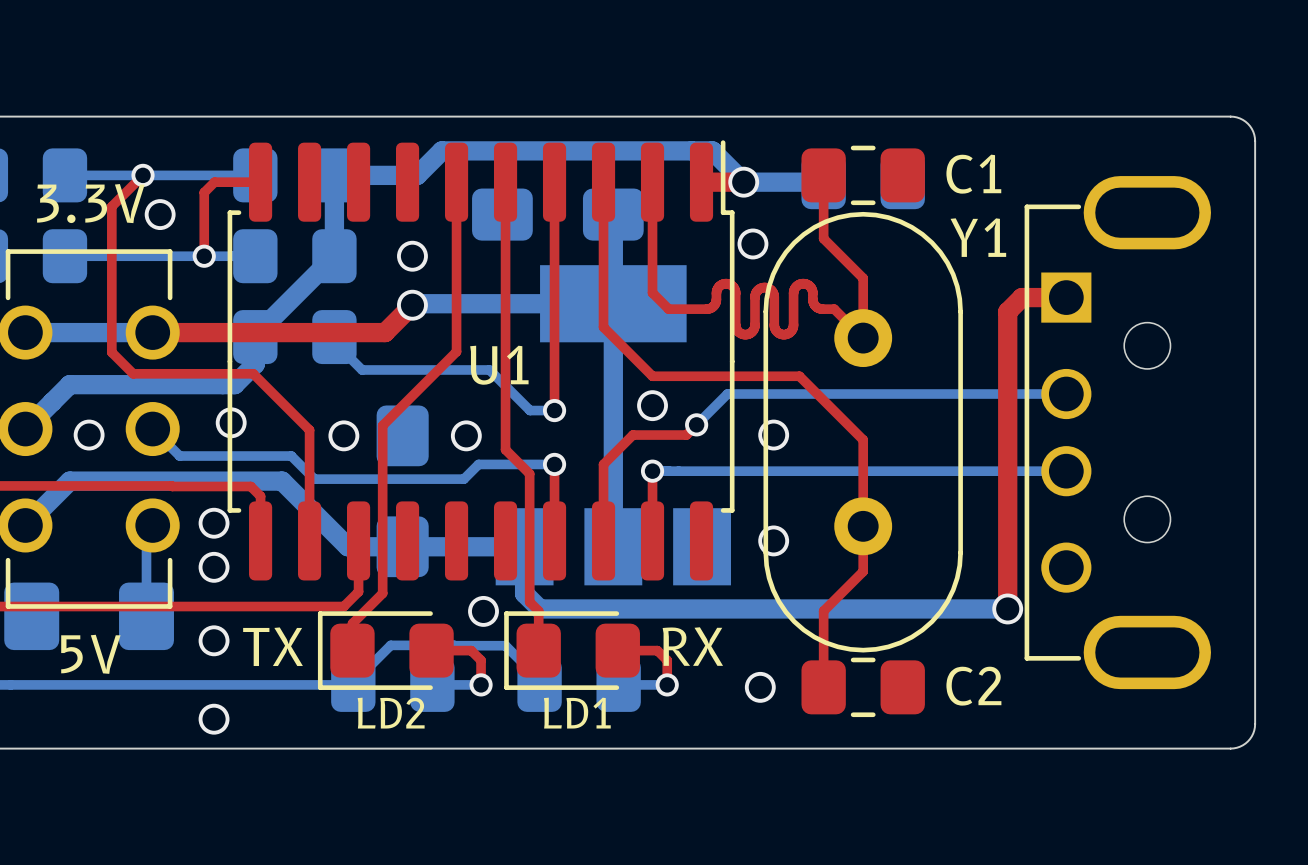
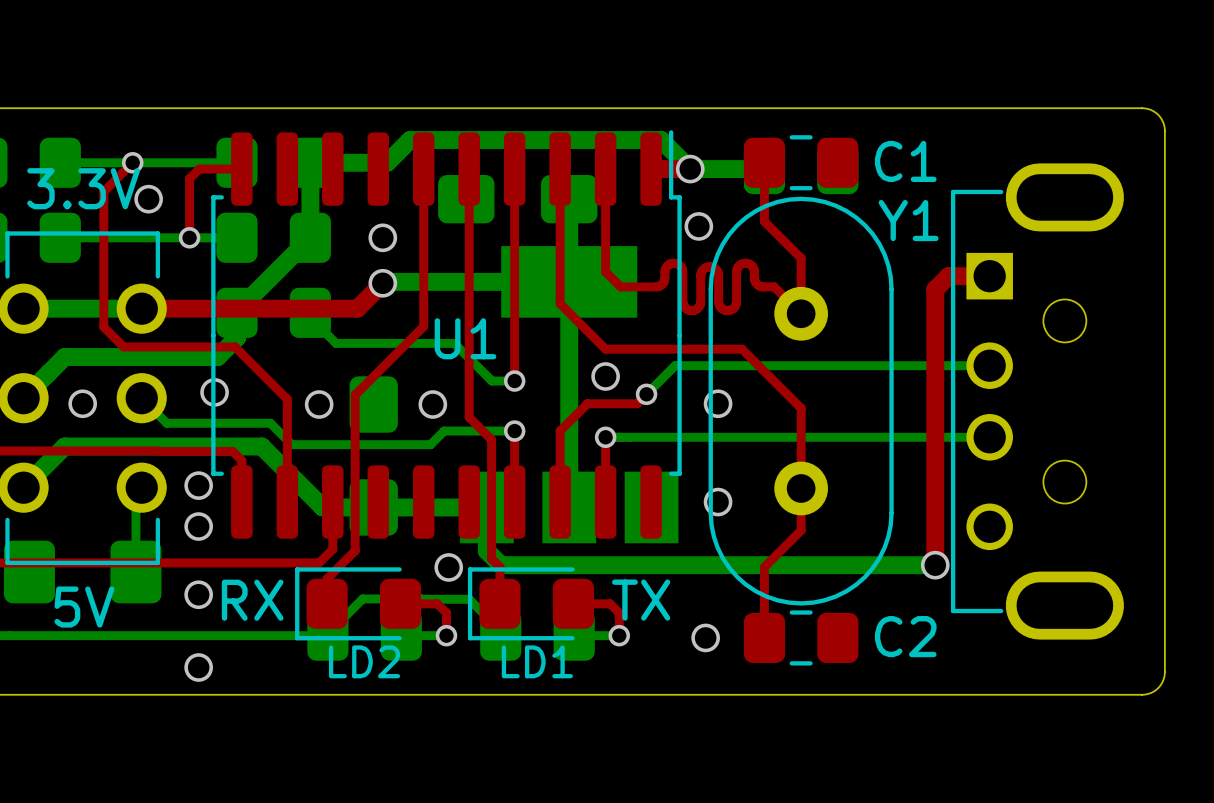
text: TX (273, 646) -> RX (252, 600)
text: RX (692, 646) -> TX (641, 600)

